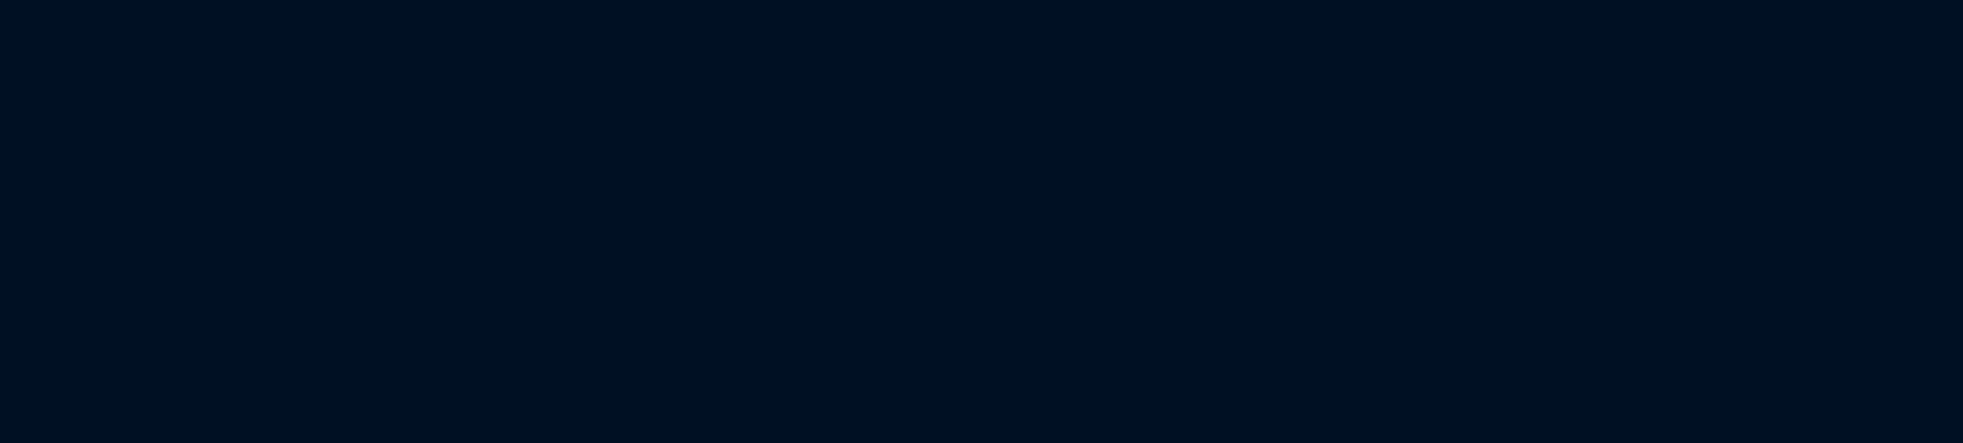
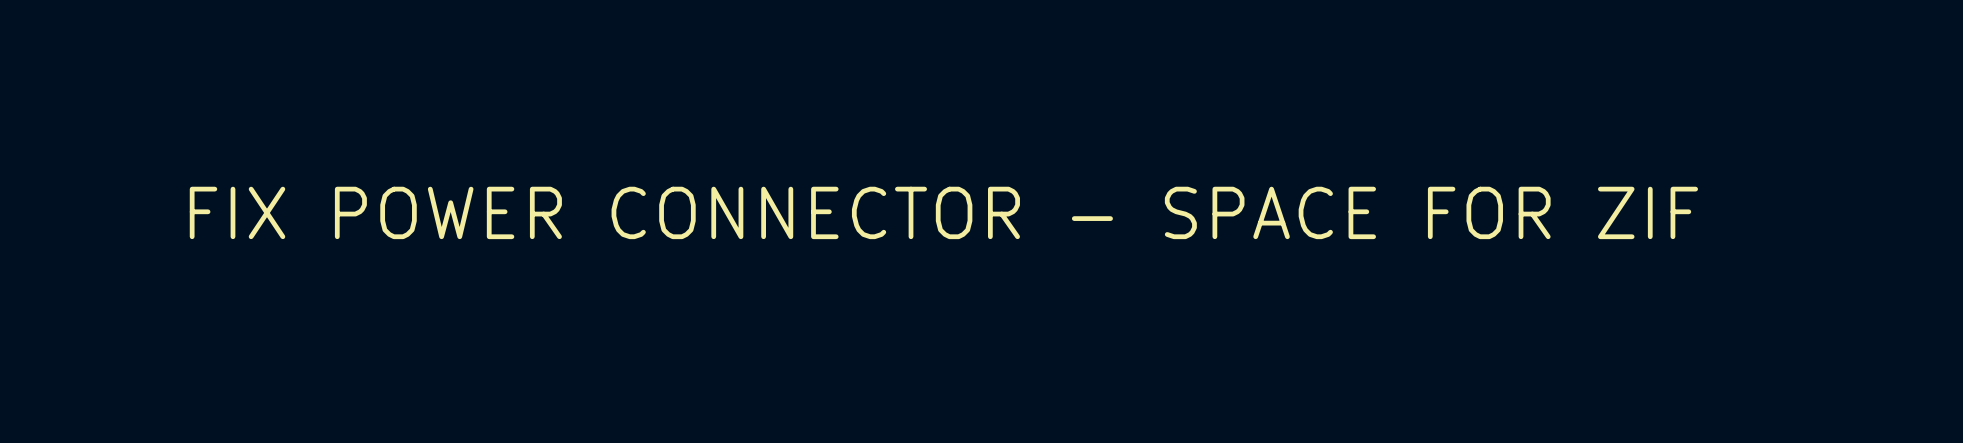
text: none -> FIX POWER CONNECTOR - SPACE FOR ZIF (943, 212)

